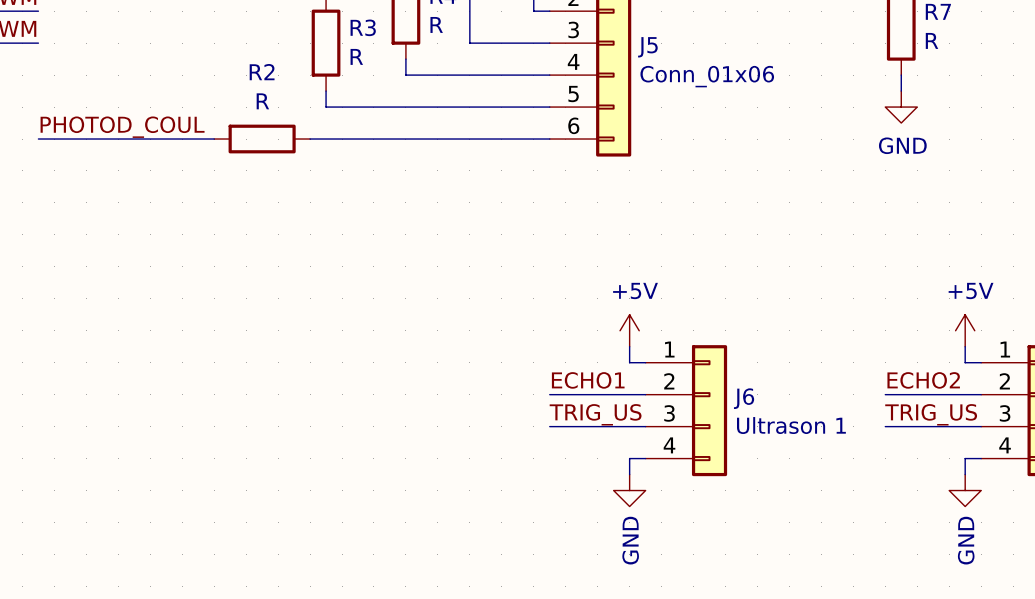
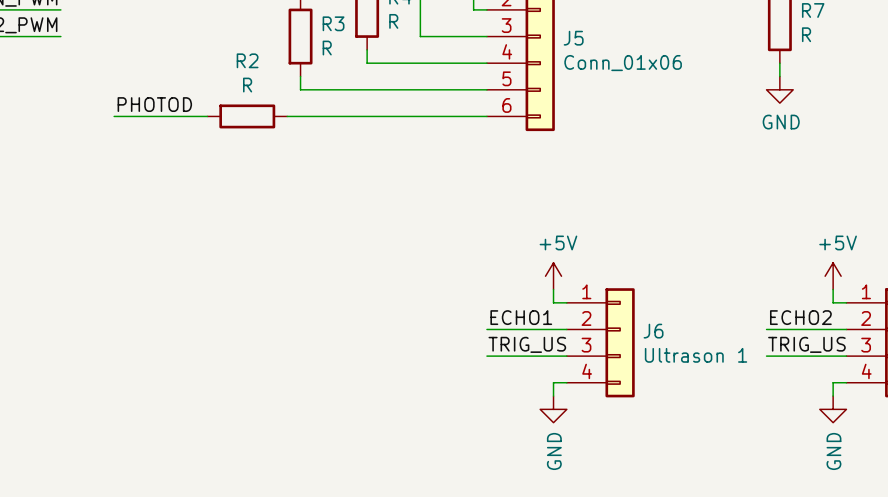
label: PHOTOD_COUL (122, 127) -> PHOTOD (154, 104)
wire: (38, 139) (102, 139) -> none

